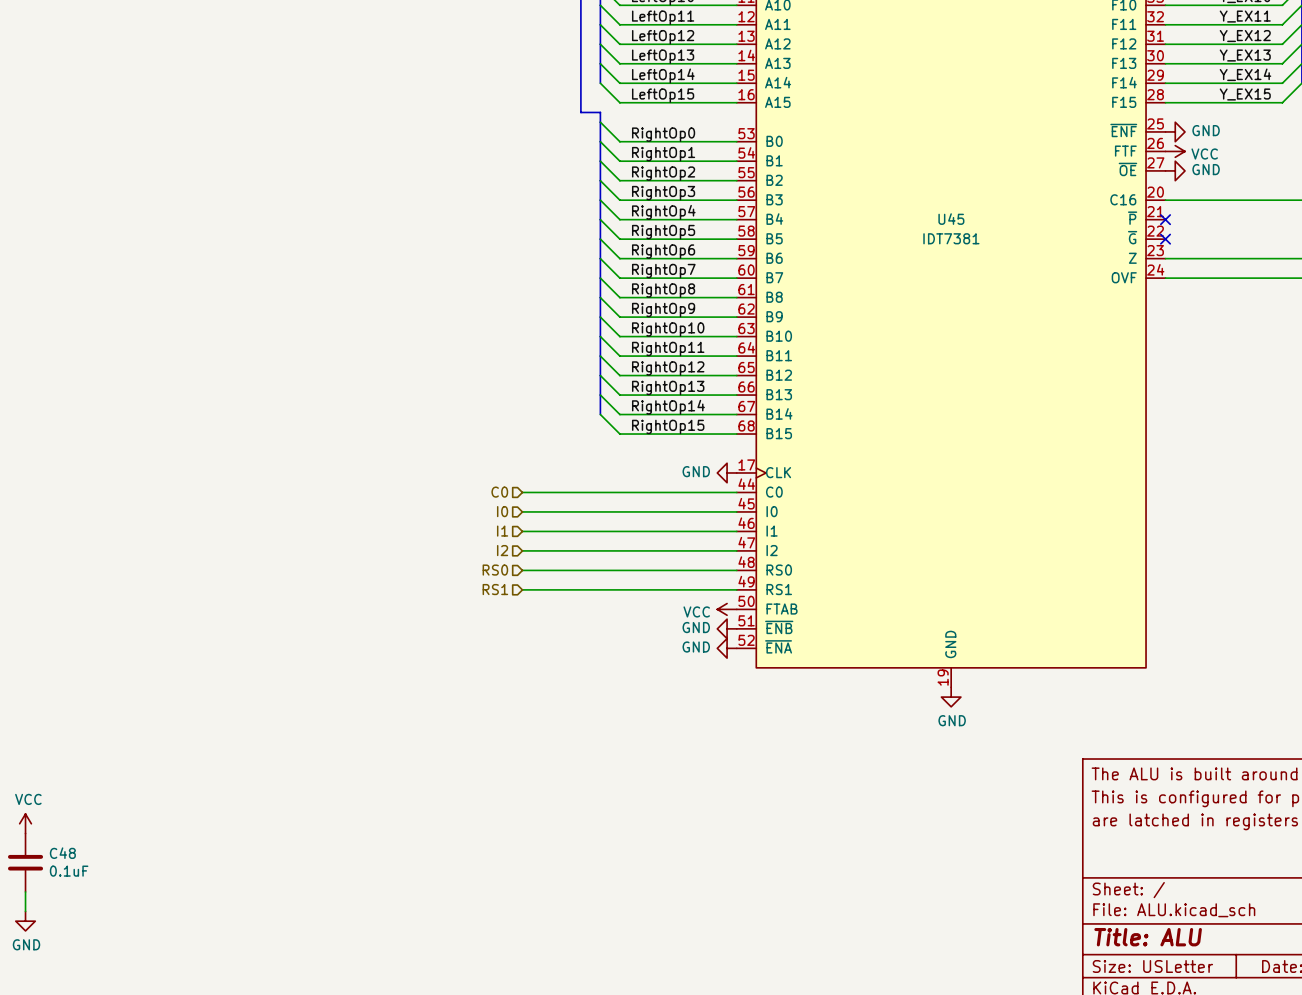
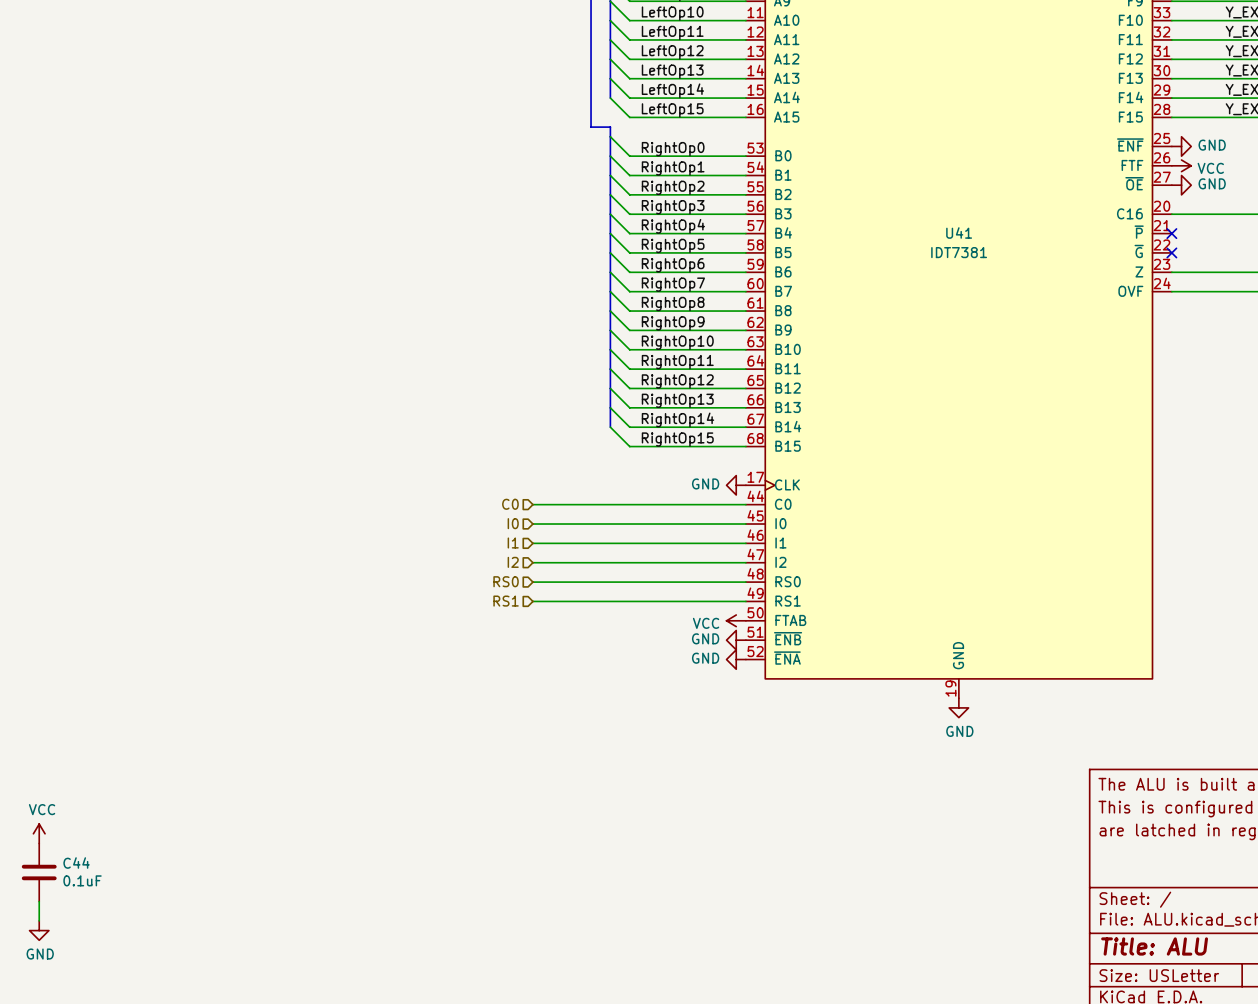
U45 name: U45 (951, 219) -> U41 (959, 232)
C48 name: C48 (62, 853) -> C44 (76, 863)

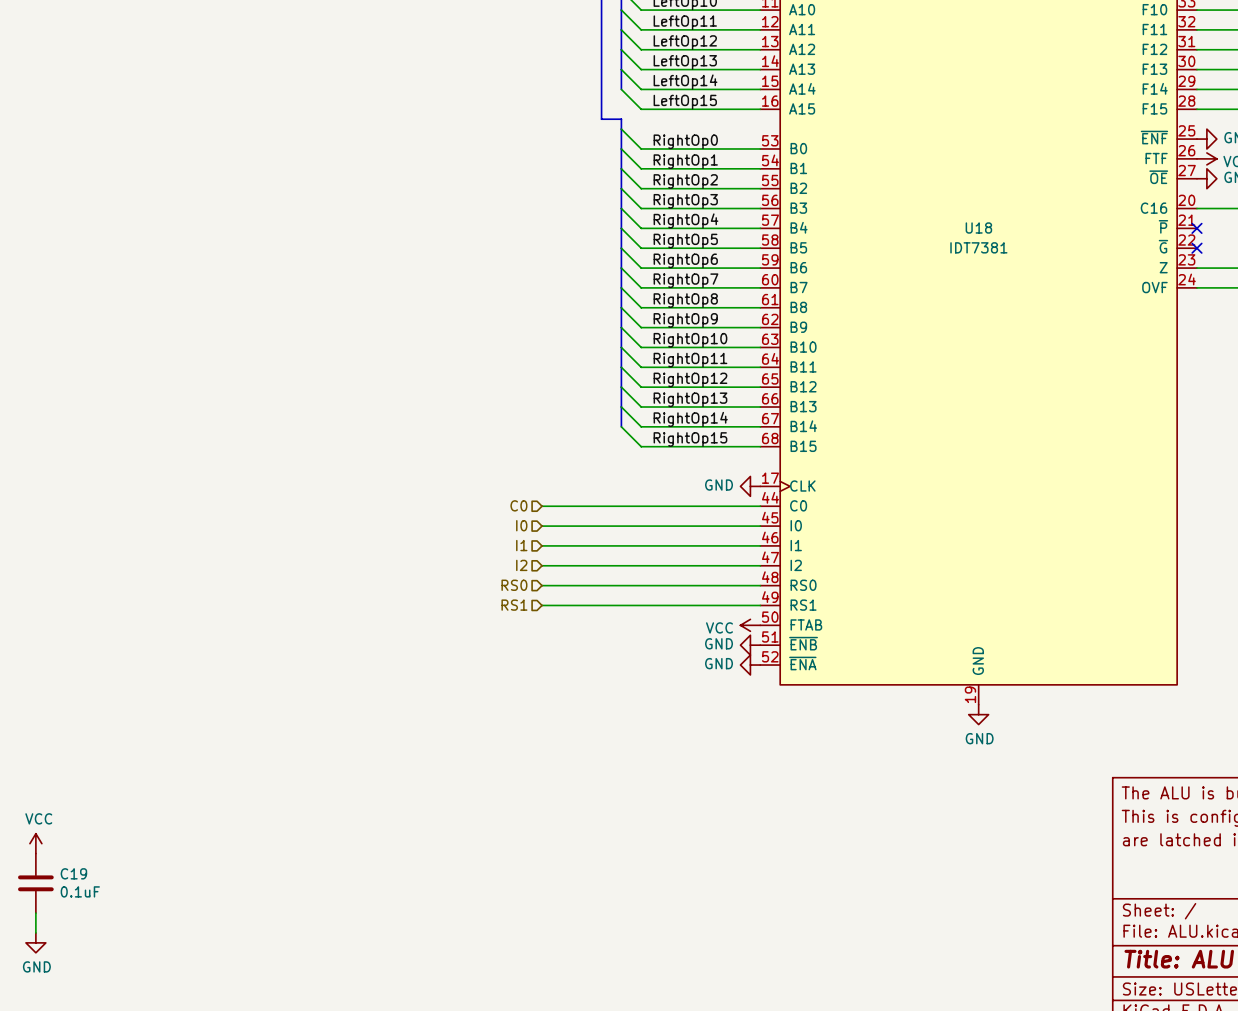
U41 name: U41 (959, 232) -> U18 (978, 228)
C44 name: C44 (76, 863) -> C19 (73, 873)

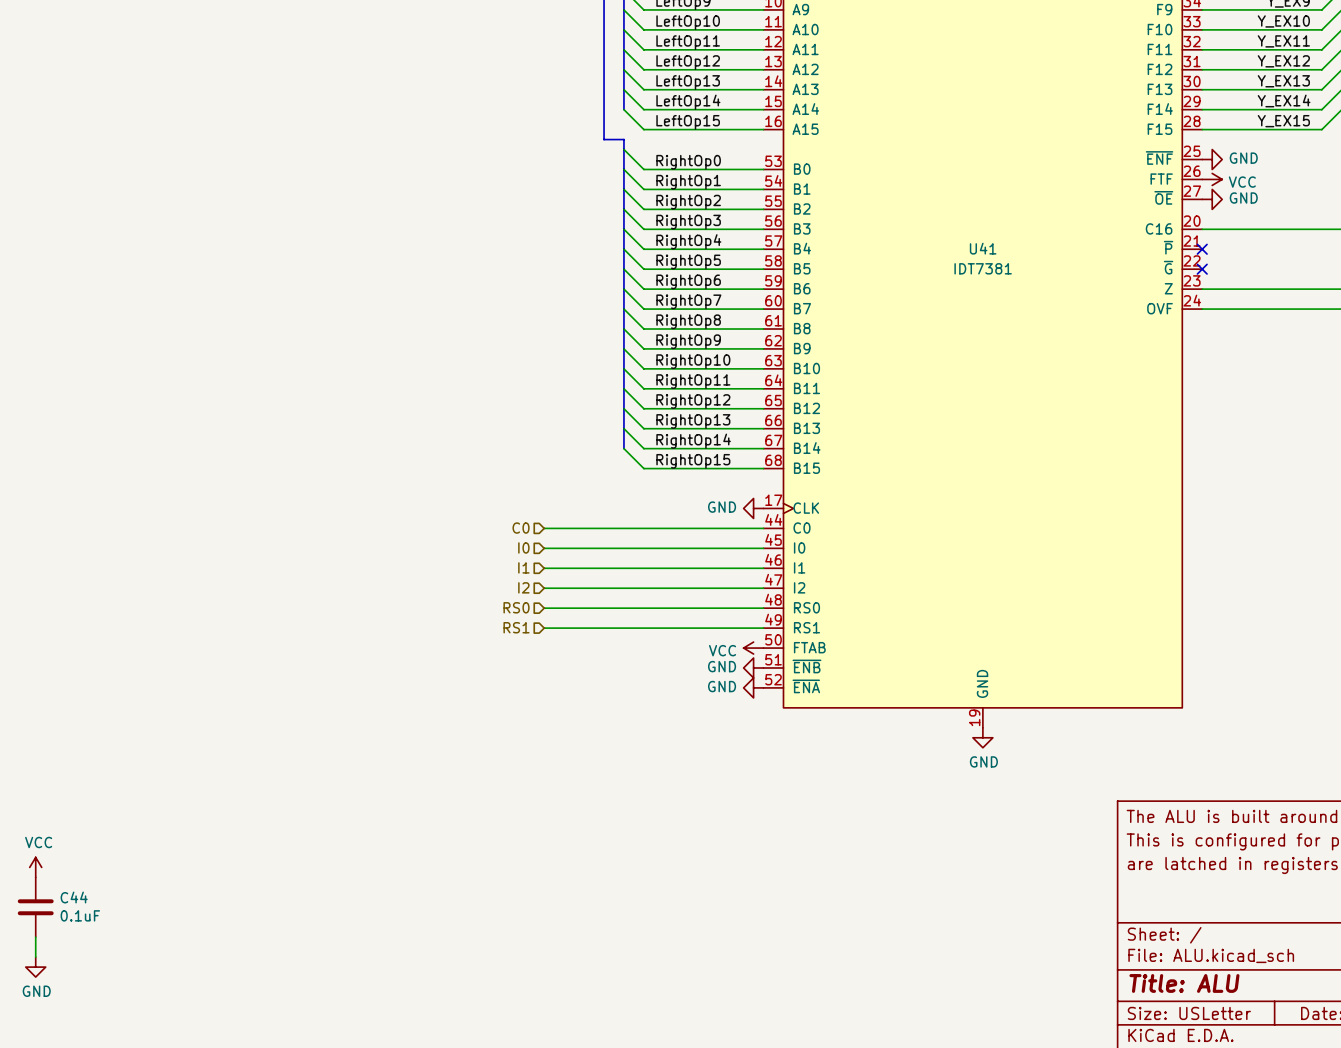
U18 name: U18 (978, 228) -> U41 (983, 248)
C19 name: C19 (73, 873) -> C44 (74, 897)

